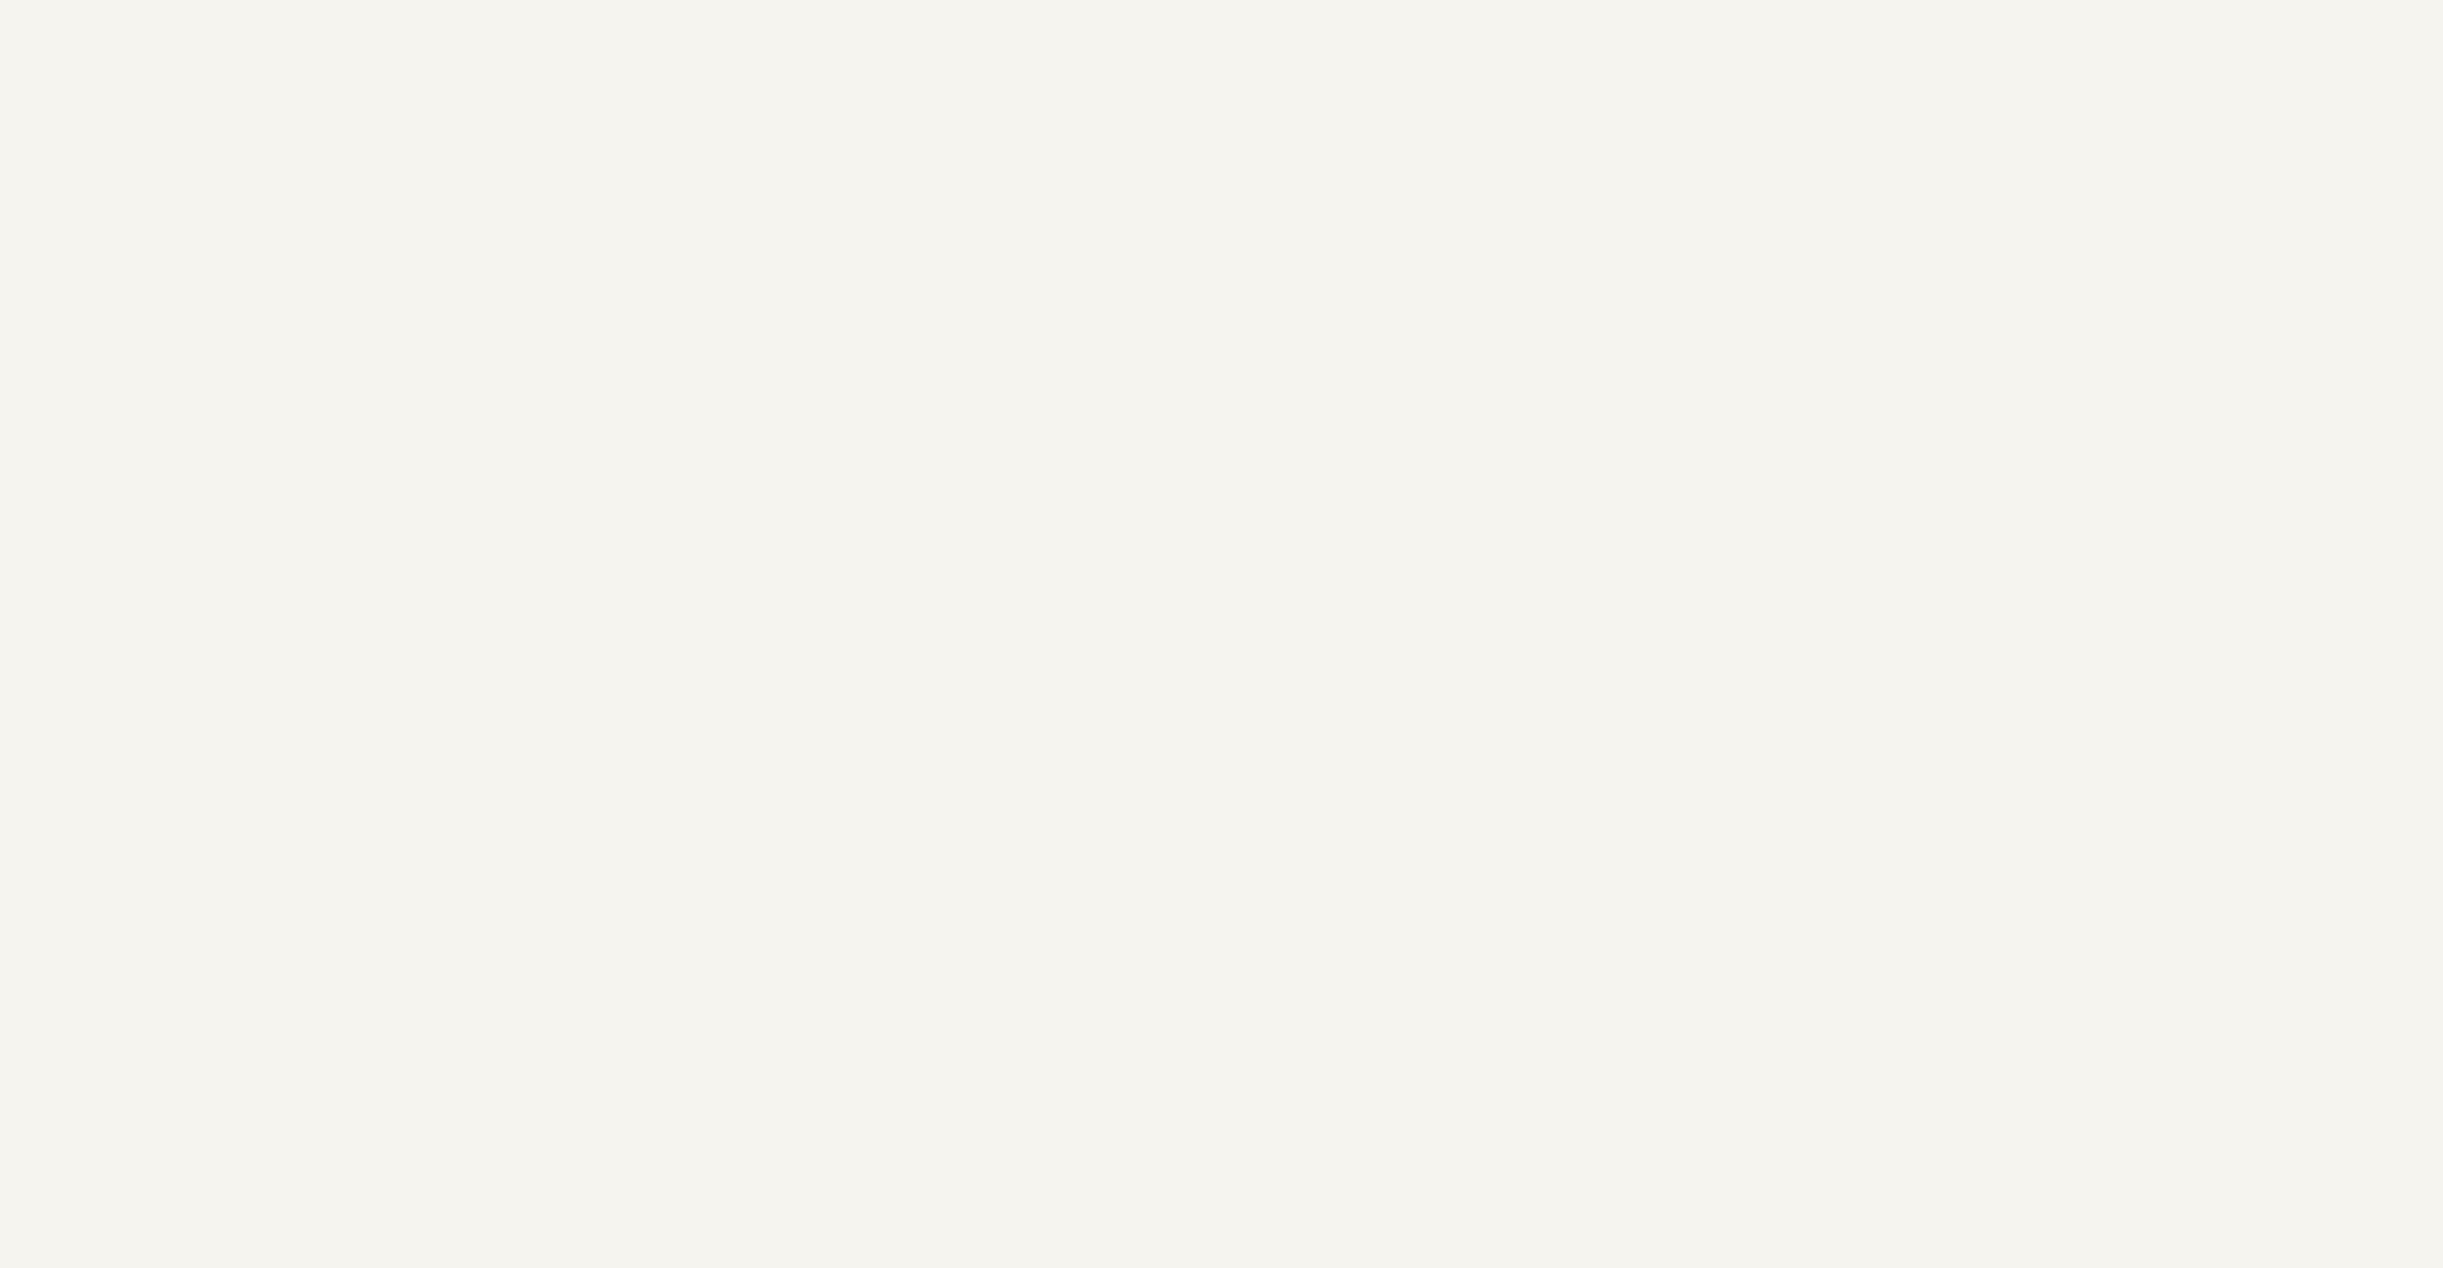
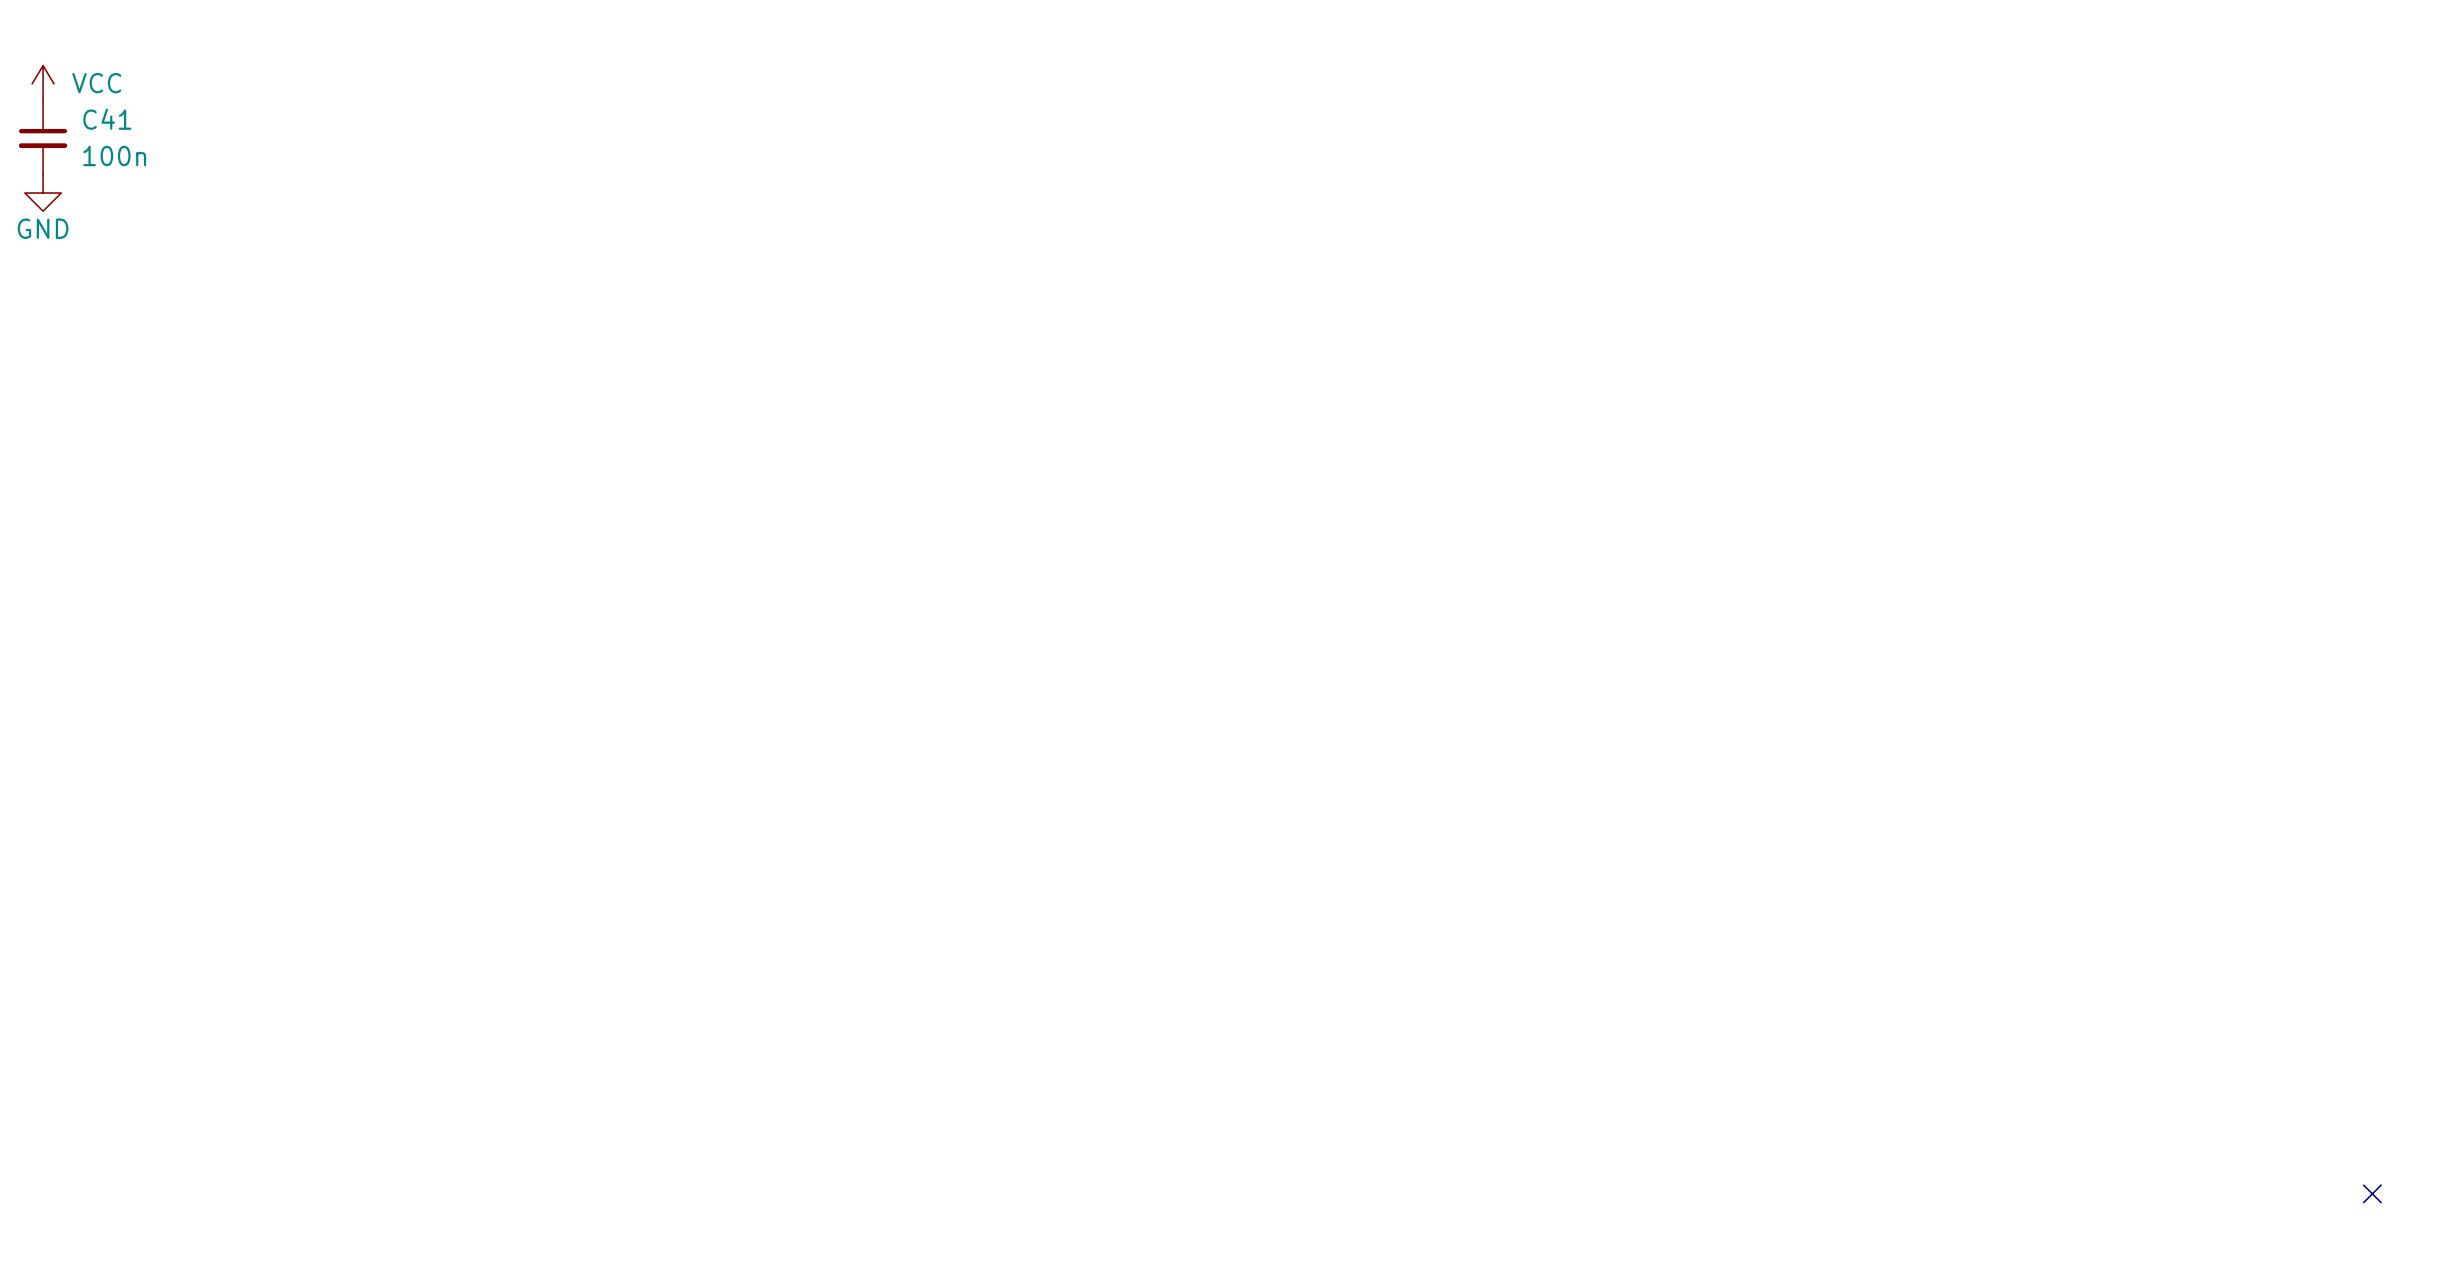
power symbol: none -> VCC (43, 83)
C41: none -> 100n (43, 138)
power symbol: none -> GND (43, 193)
no-connect mark: none -> (2372, 1193)

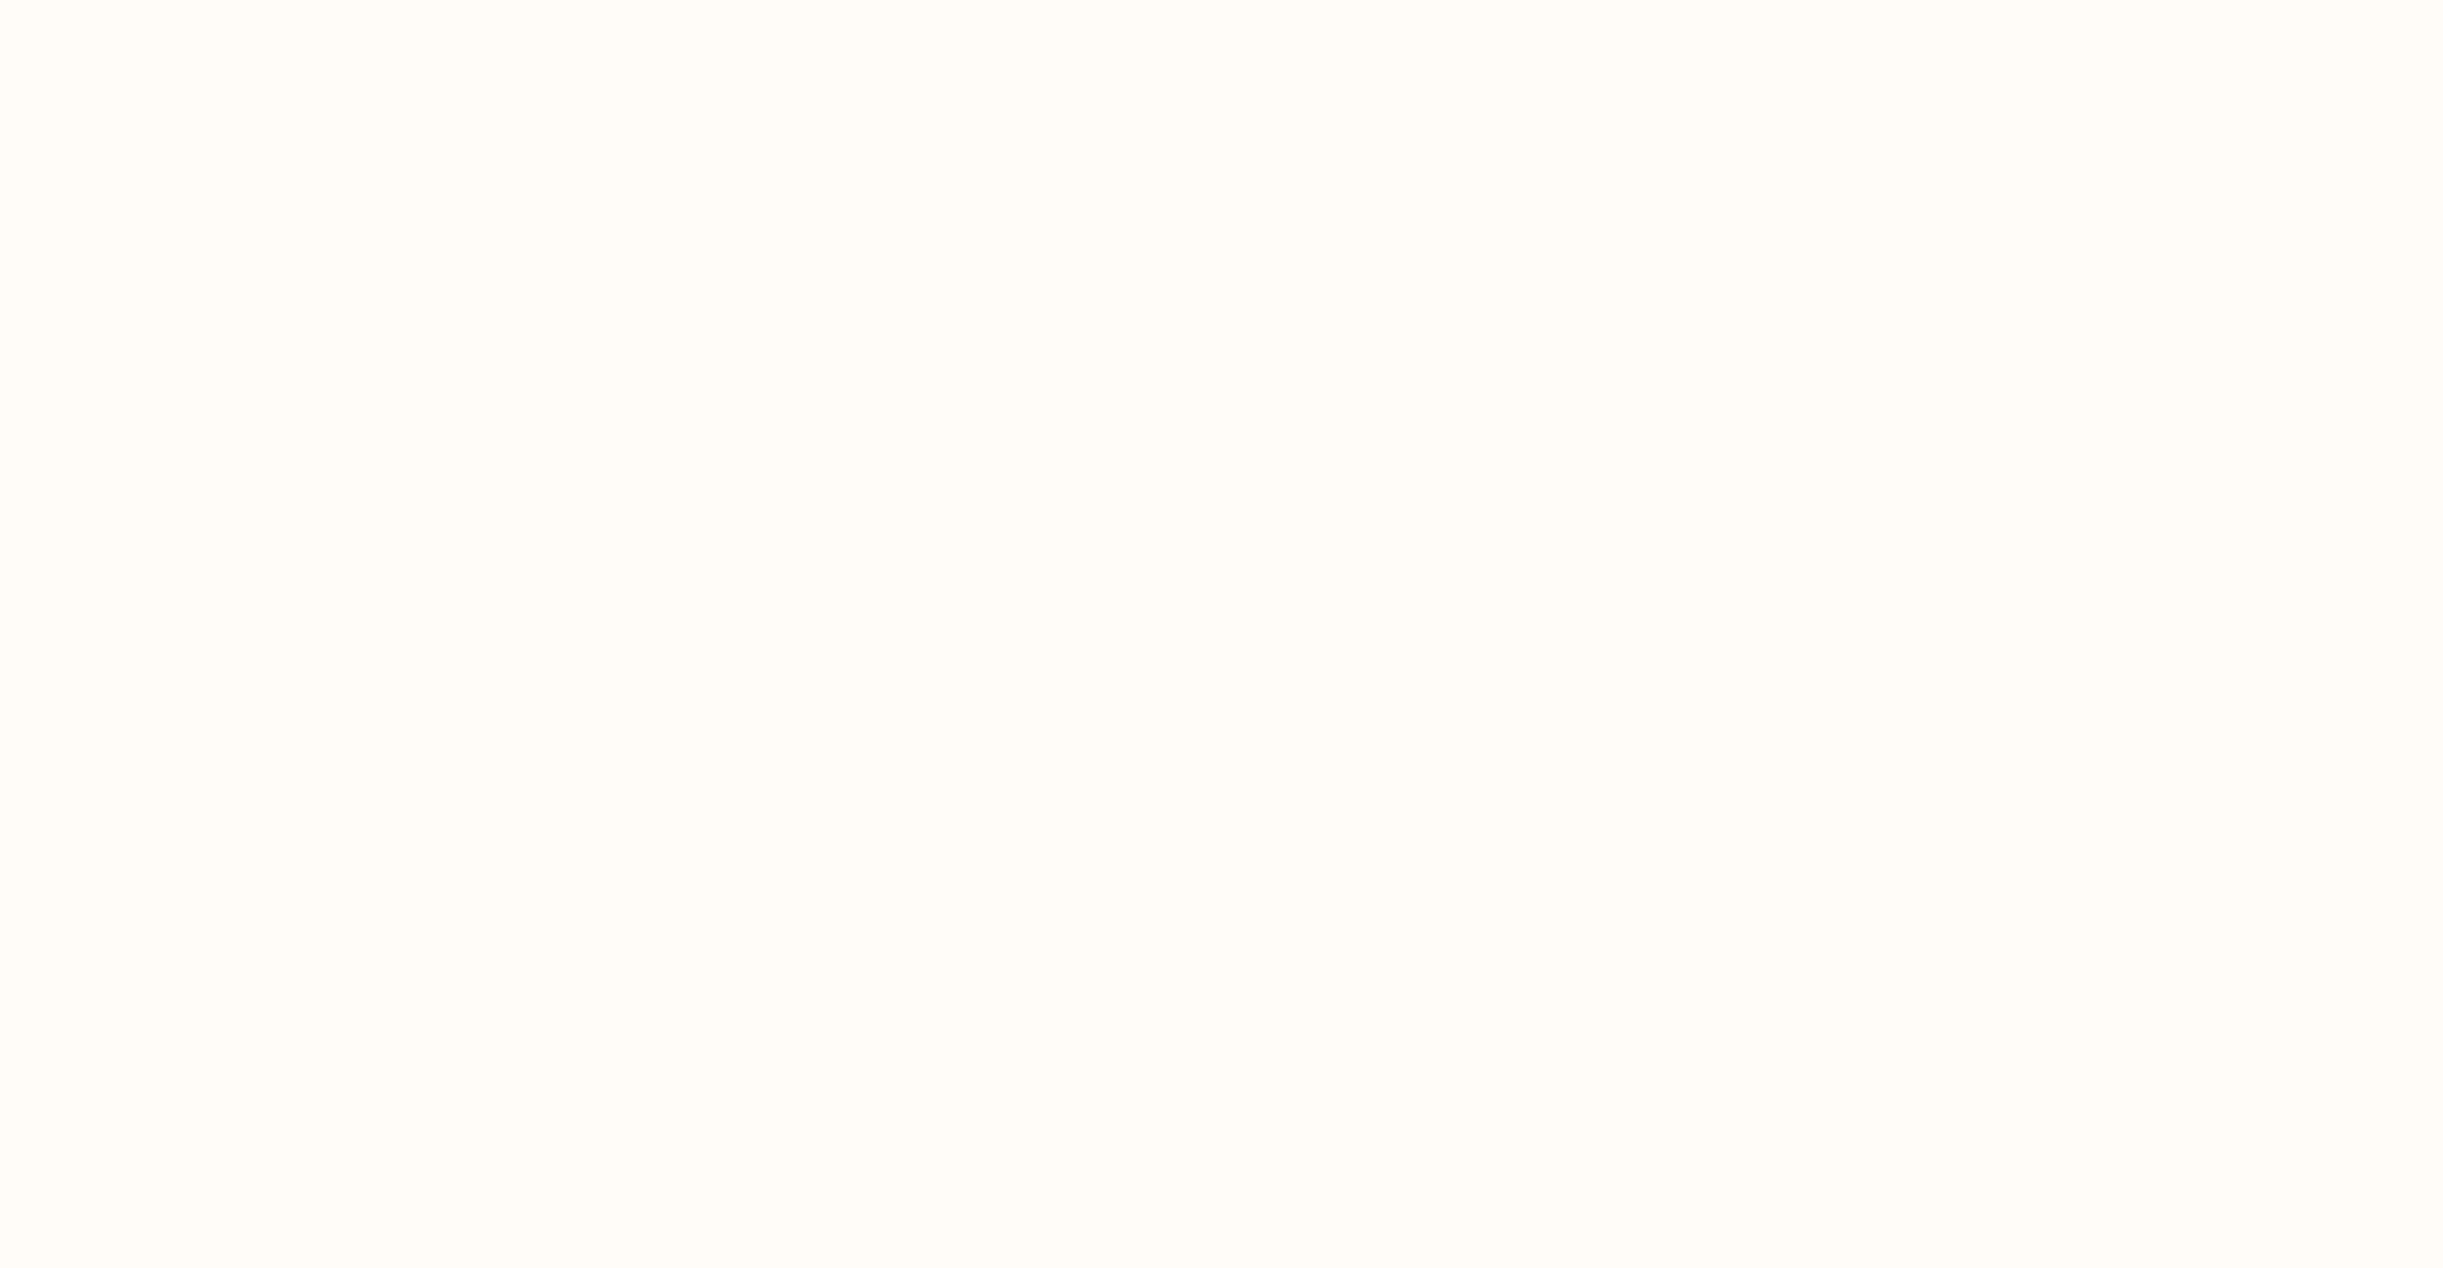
power symbol: VCC (43, 83) -> none
C41: 100n (43, 138) -> none
power symbol: GND (43, 193) -> none
no-connect mark: (2372, 1193) -> none

